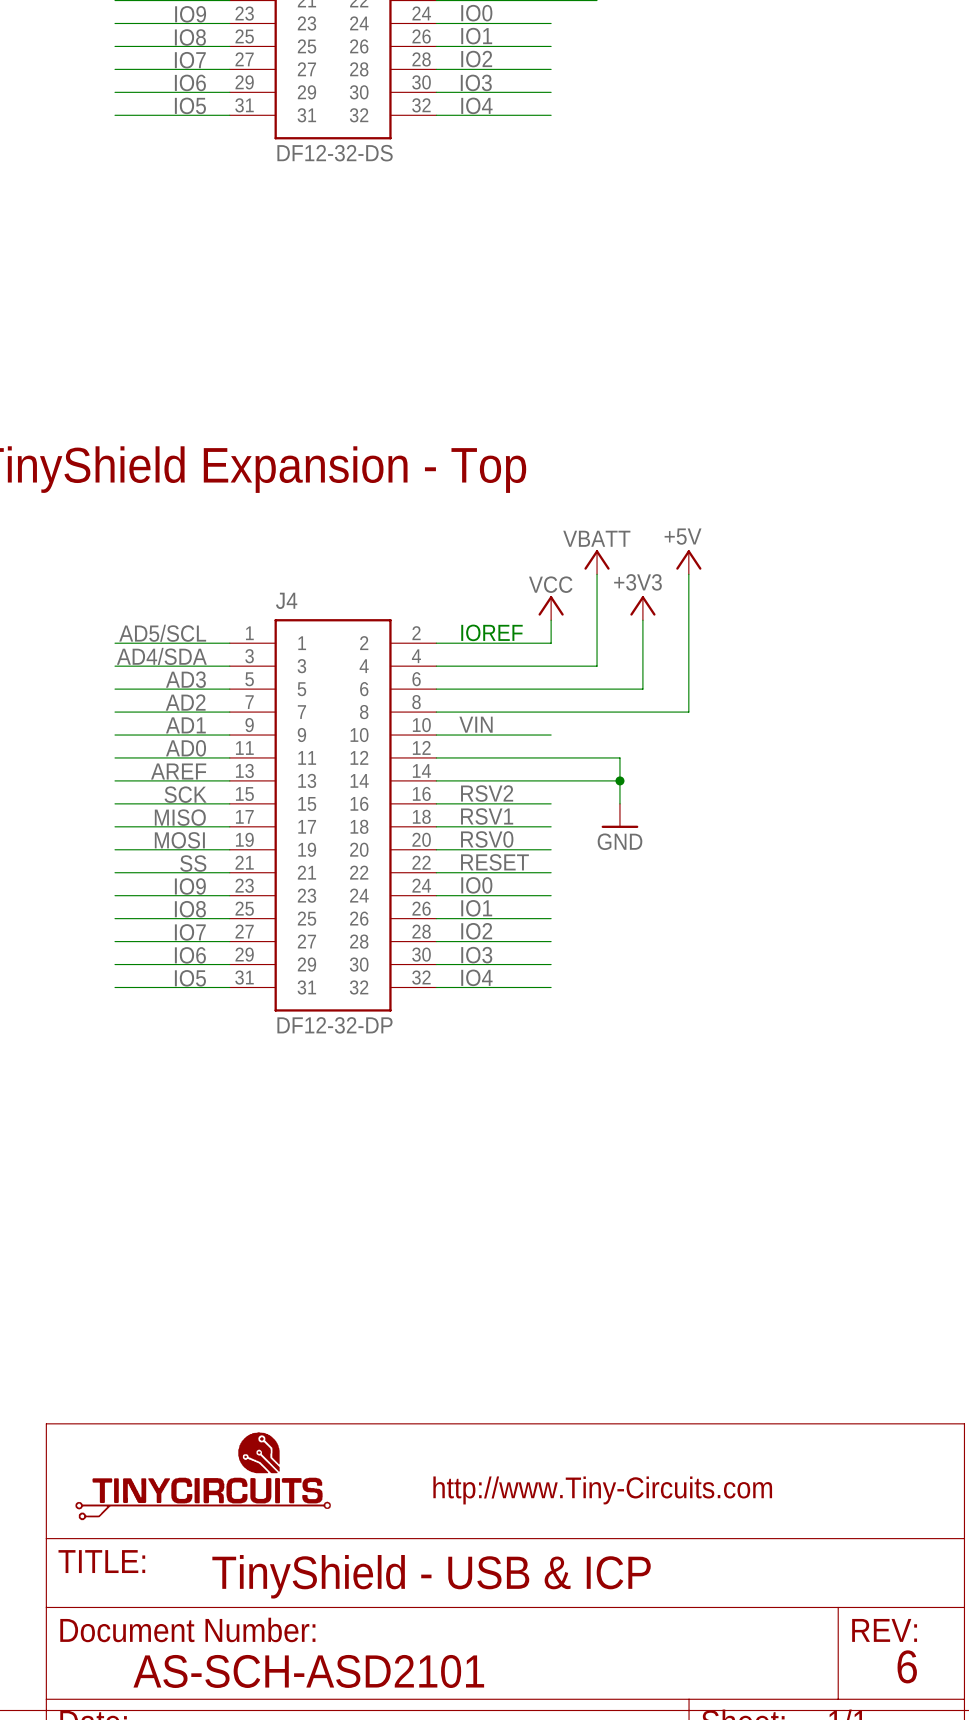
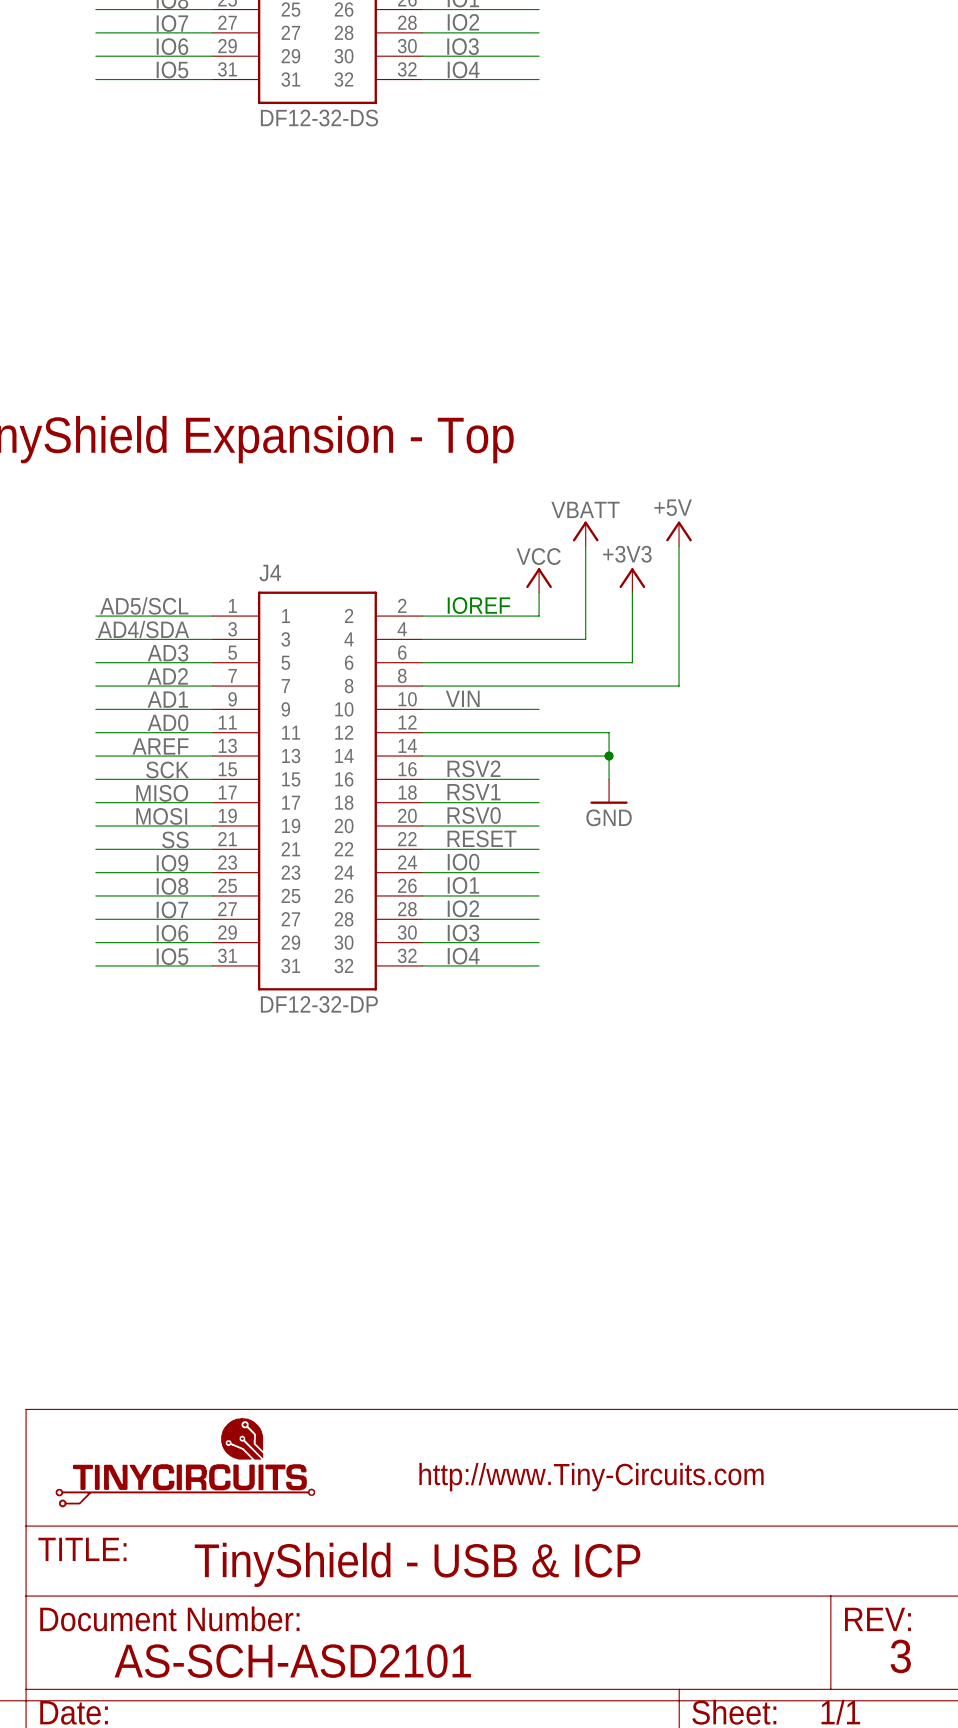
text: 6 (907, 1666) -> 3 (900, 1656)

